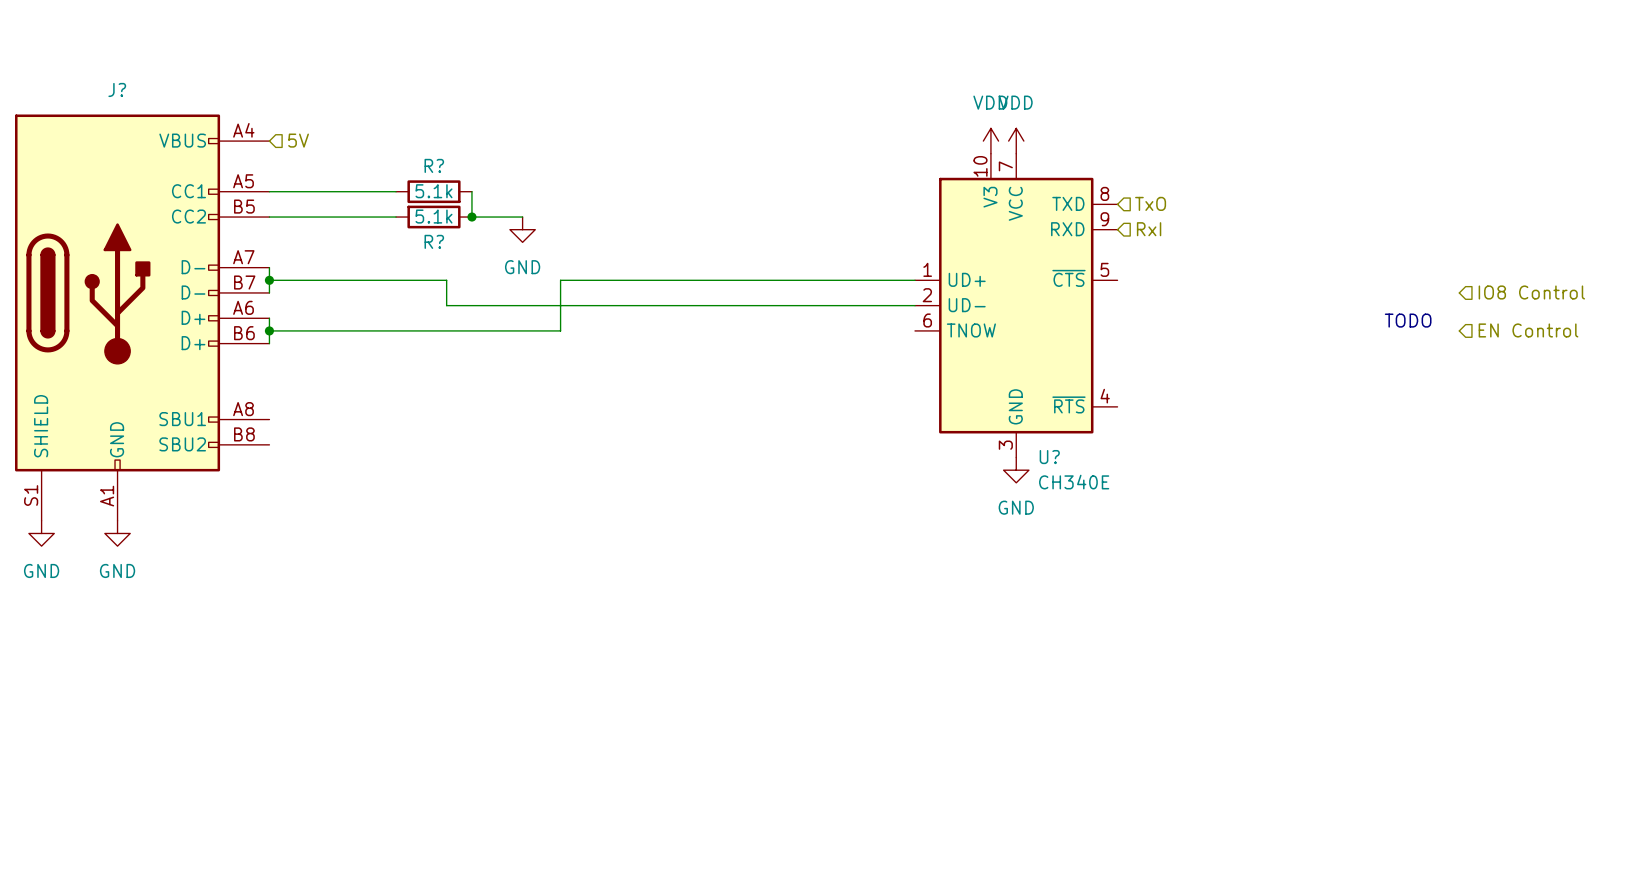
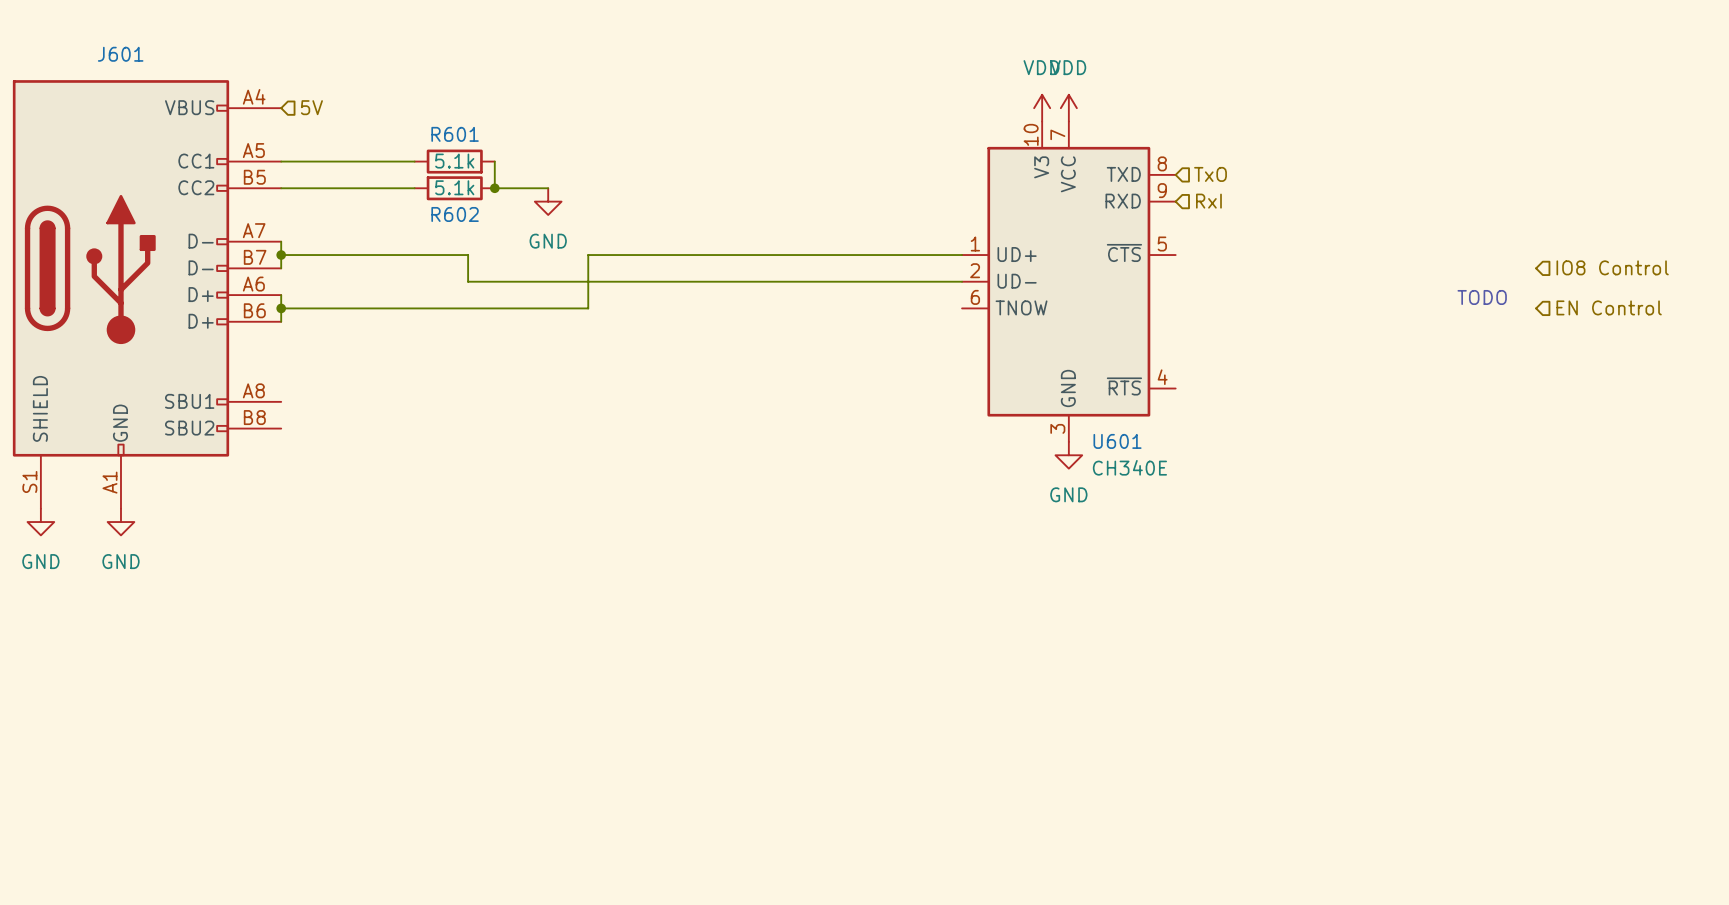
J? name: J? (117, 89) -> J601 (120, 54)
R? name: R? (434, 165) -> R601 (455, 134)
R? name: R? (434, 241) -> R602 (455, 214)
U? name: U? (1049, 457) -> U601 (1117, 441)

